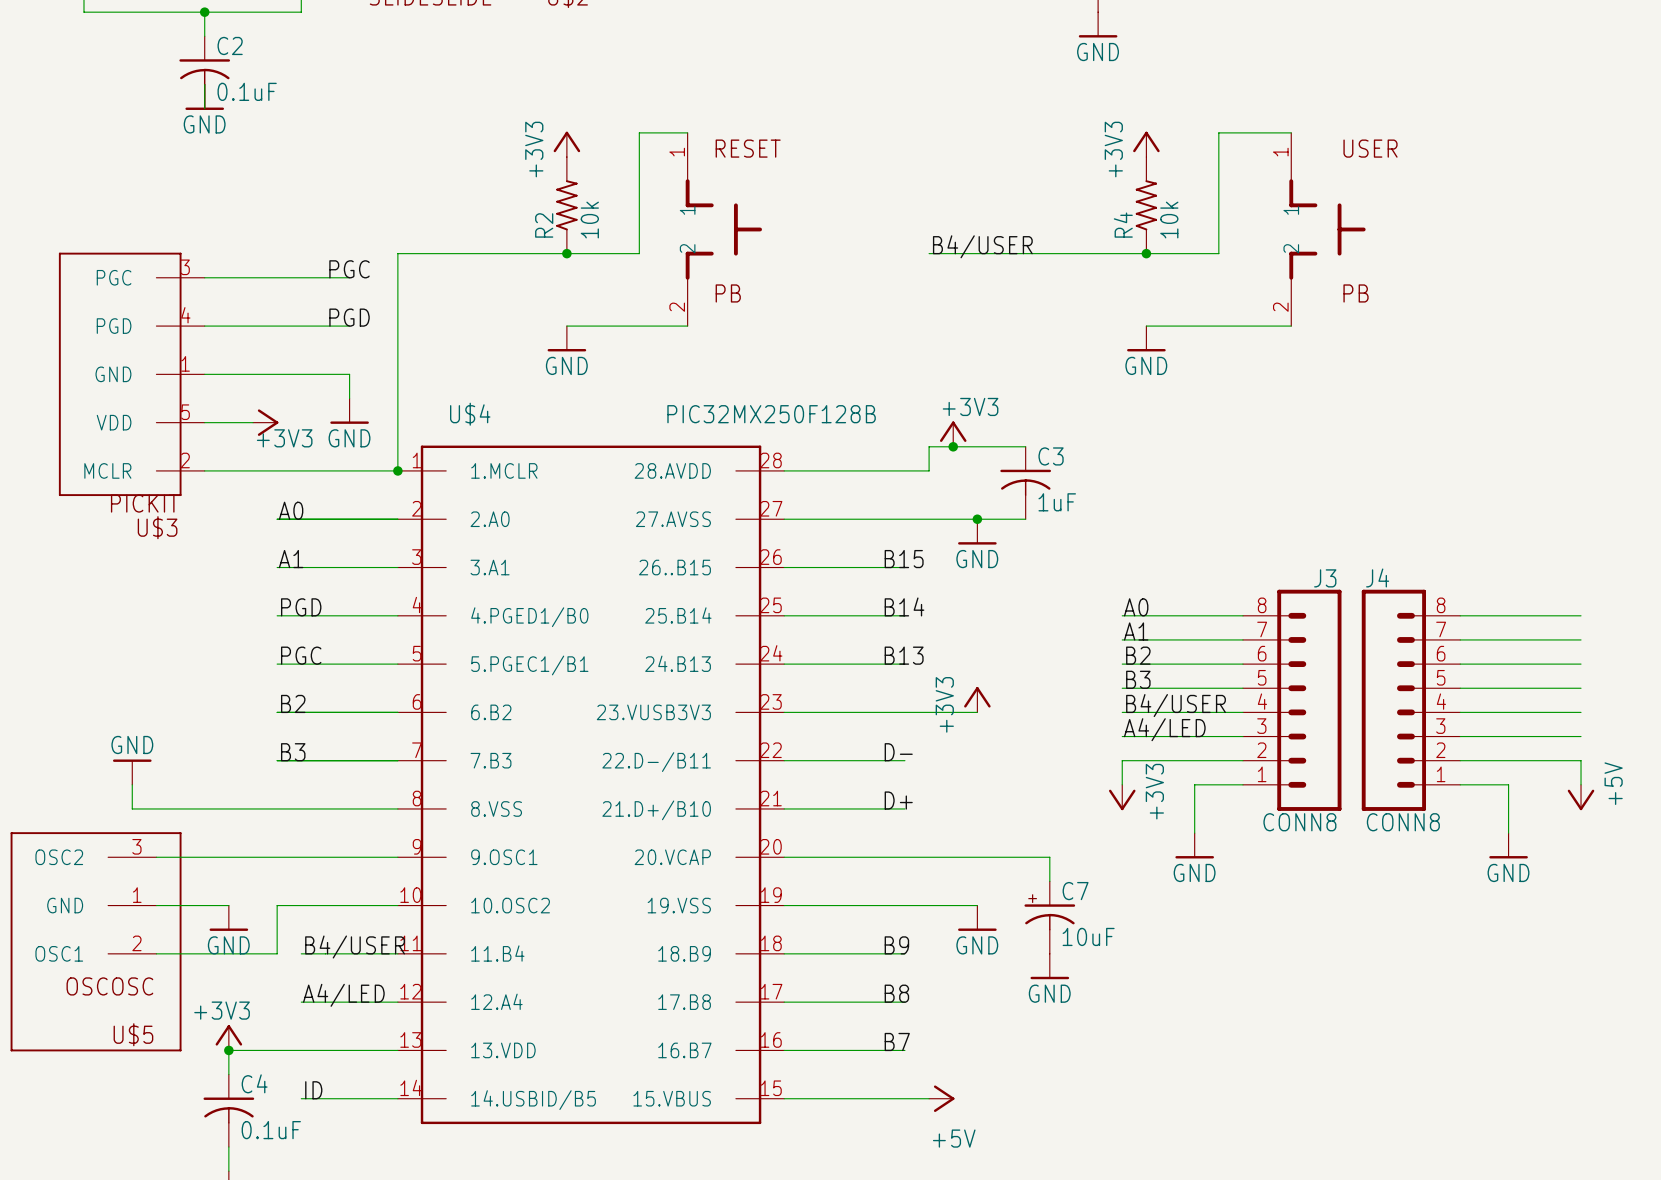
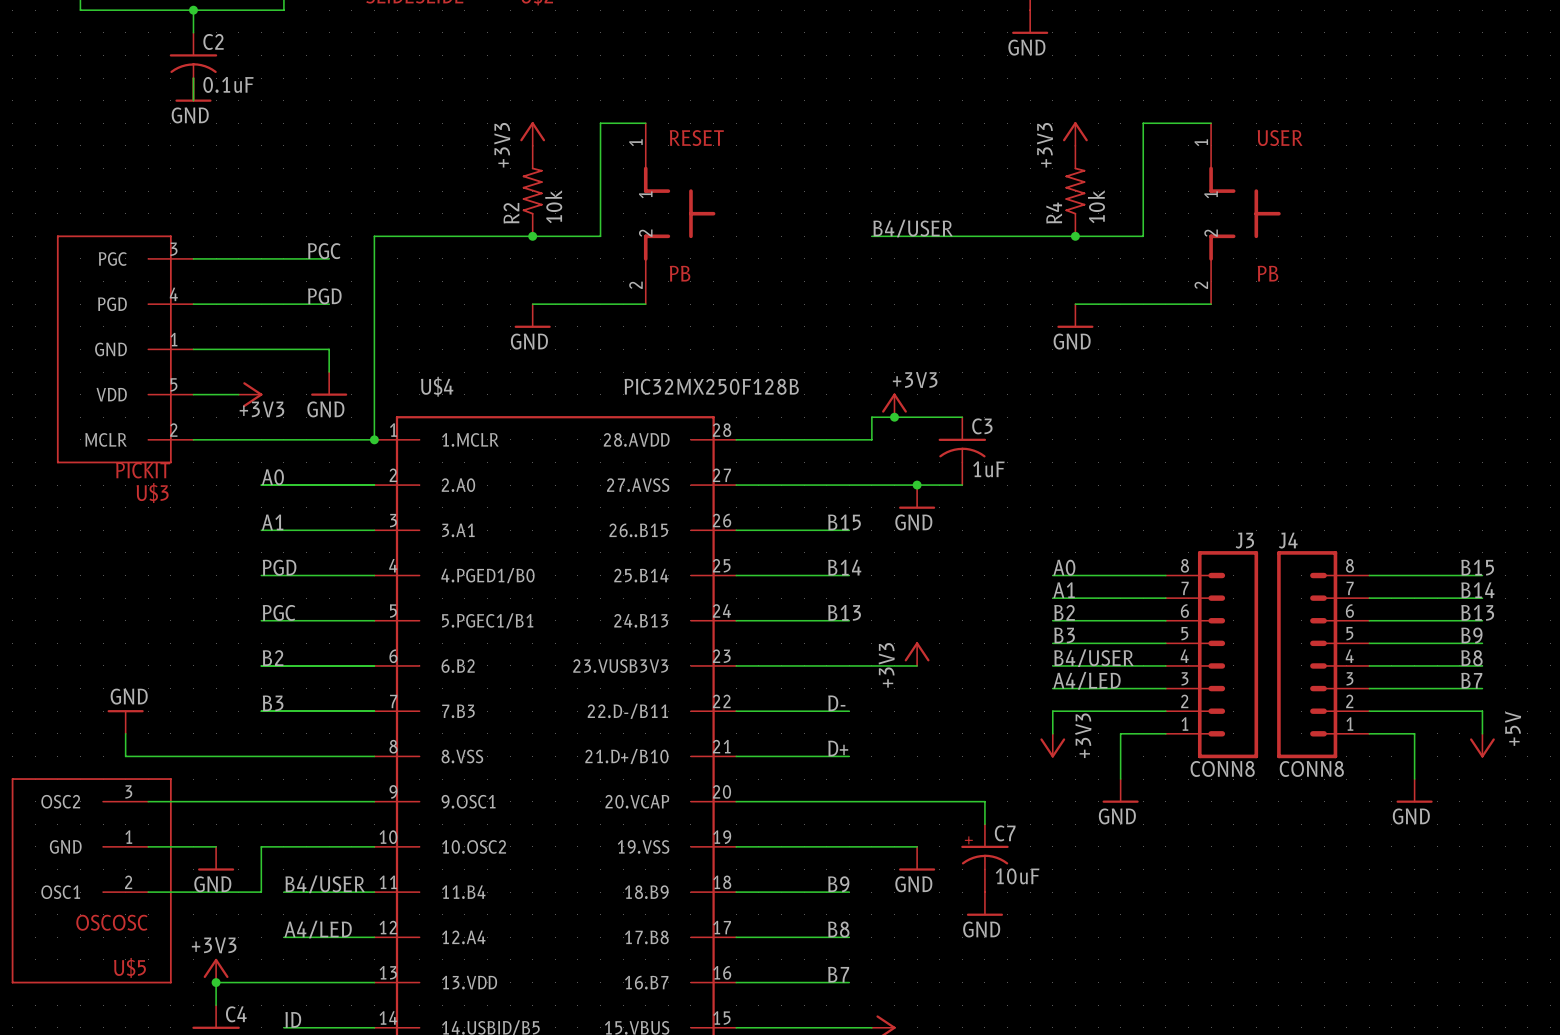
label: none -> B15 (1477, 567)
label: none -> B14 (1477, 590)
label: none -> B13 (1477, 612)
label: none -> B9 (1471, 635)
label: none -> B8 (1471, 658)
label: none -> B7 (1471, 680)

